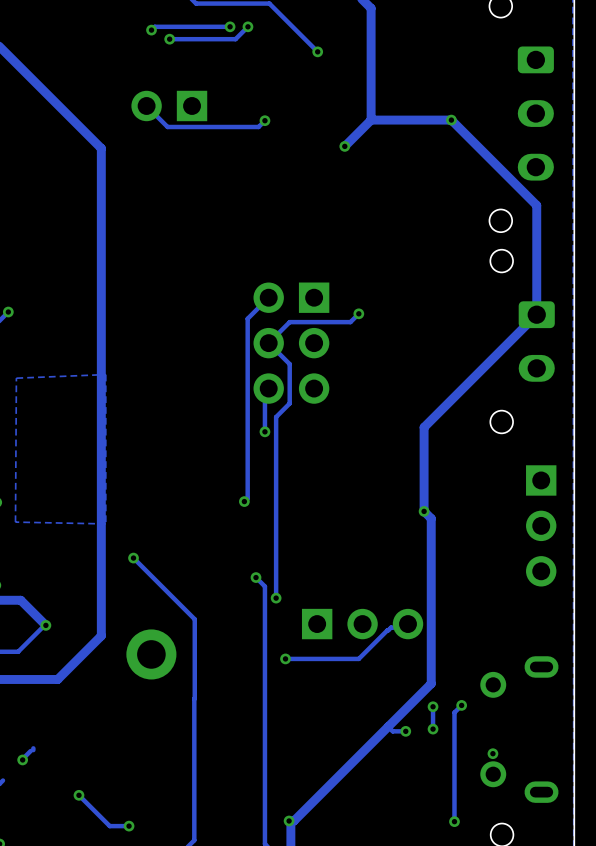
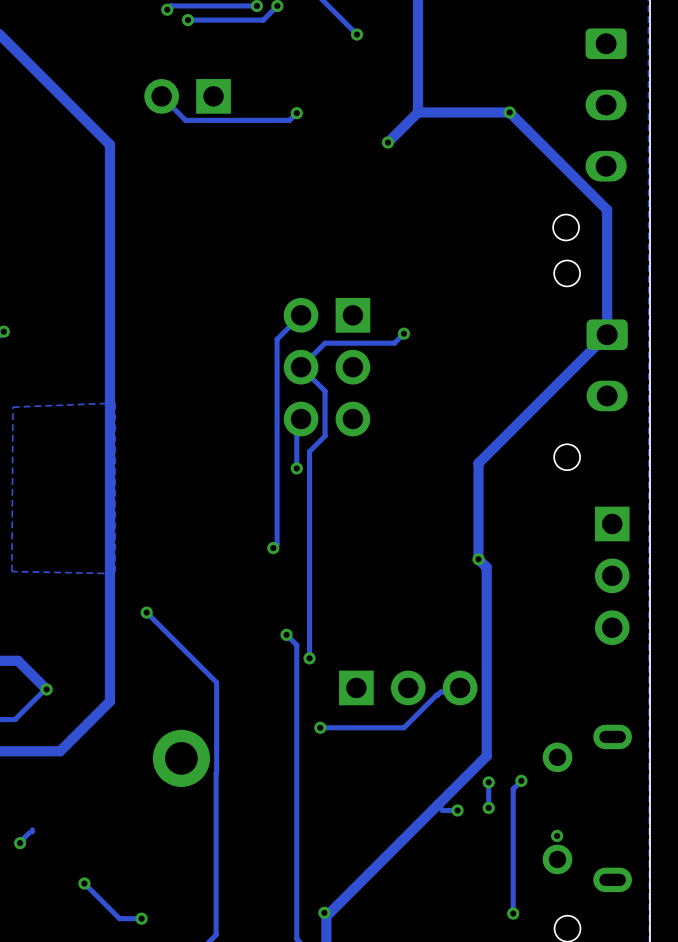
part position: (151, 654) -> (181, 758)

